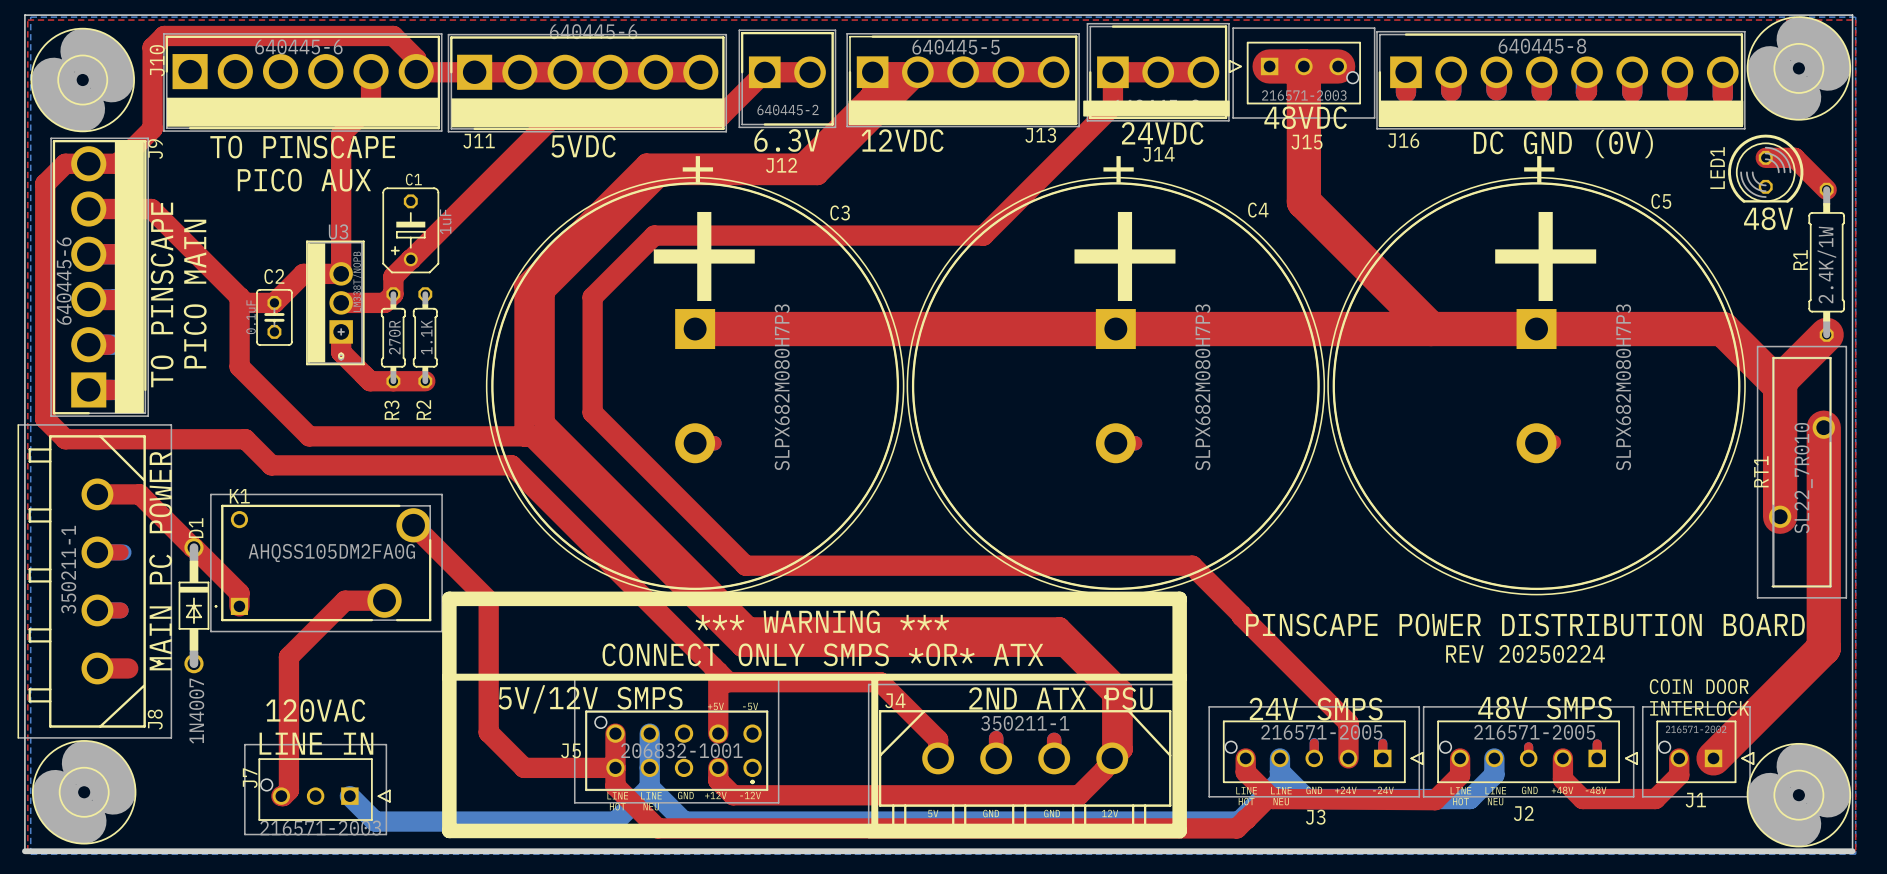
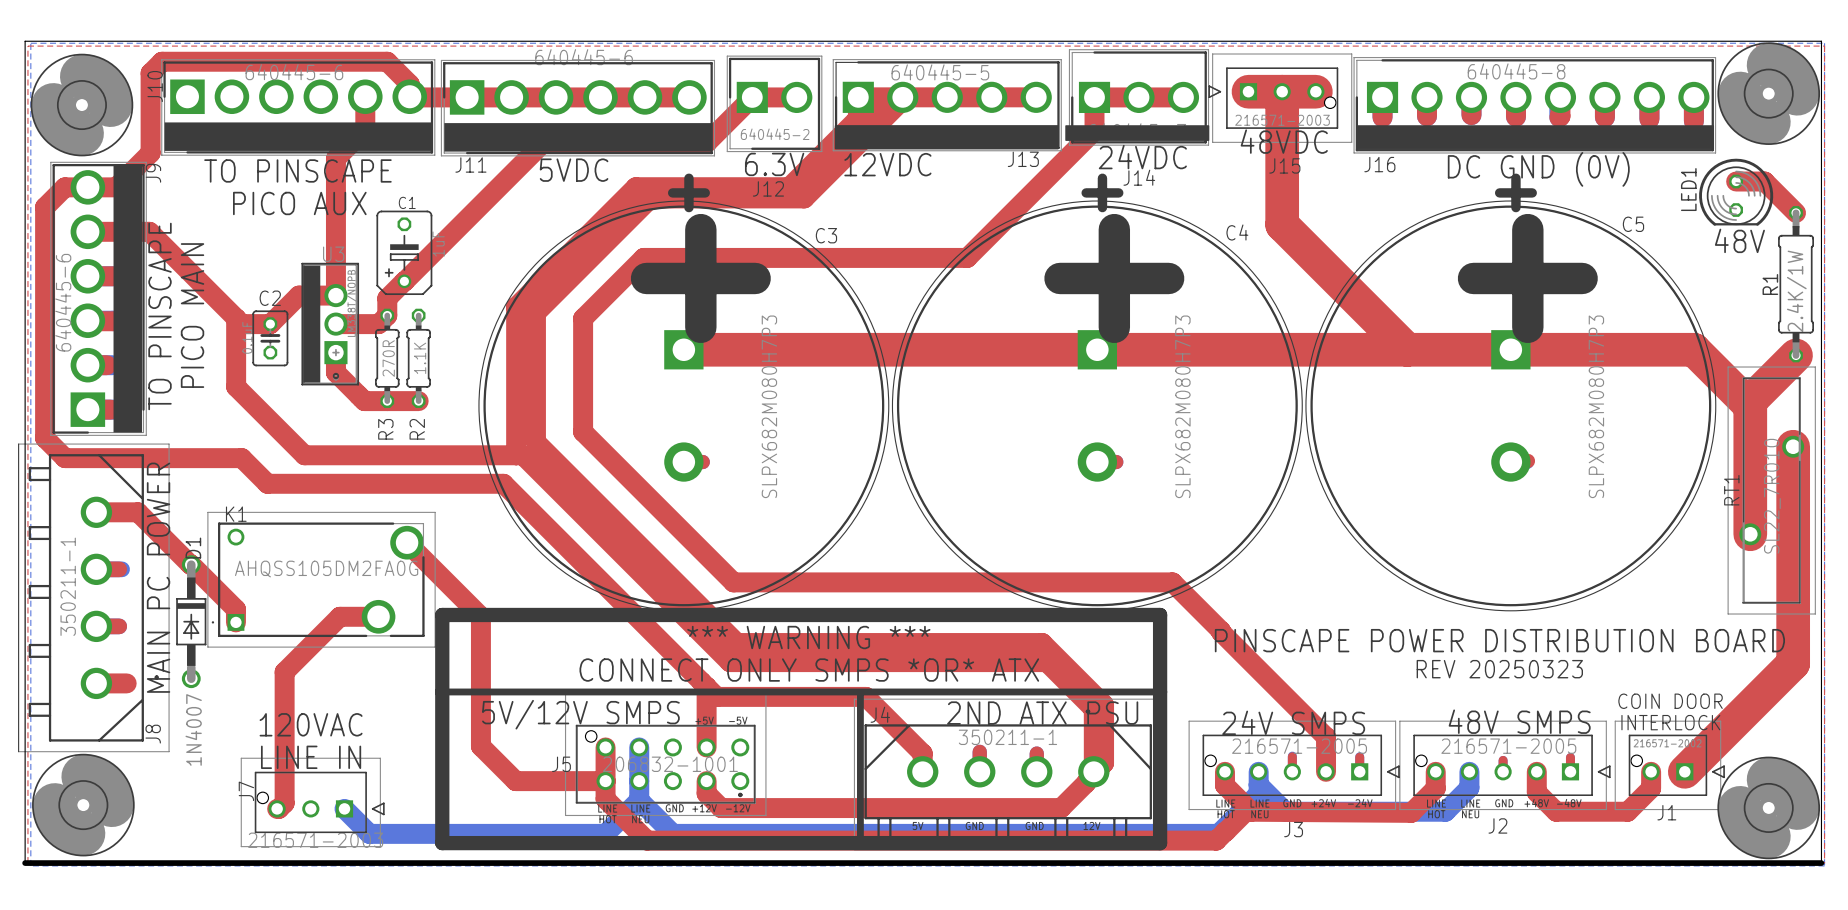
text: REV 20250224 (1525, 653) -> REV 20250323 (1499, 669)

